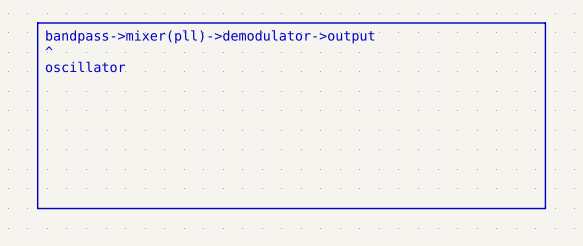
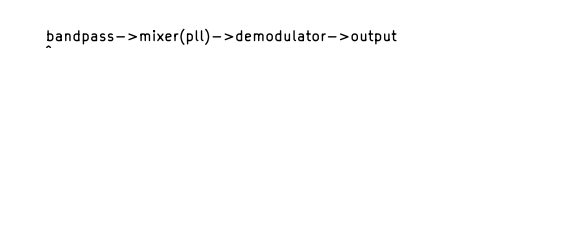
line: (37, 23) (545, 23) (545, 208) (37, 208) (37, 23) -> none
text: oscillator (85, 66) -> none

